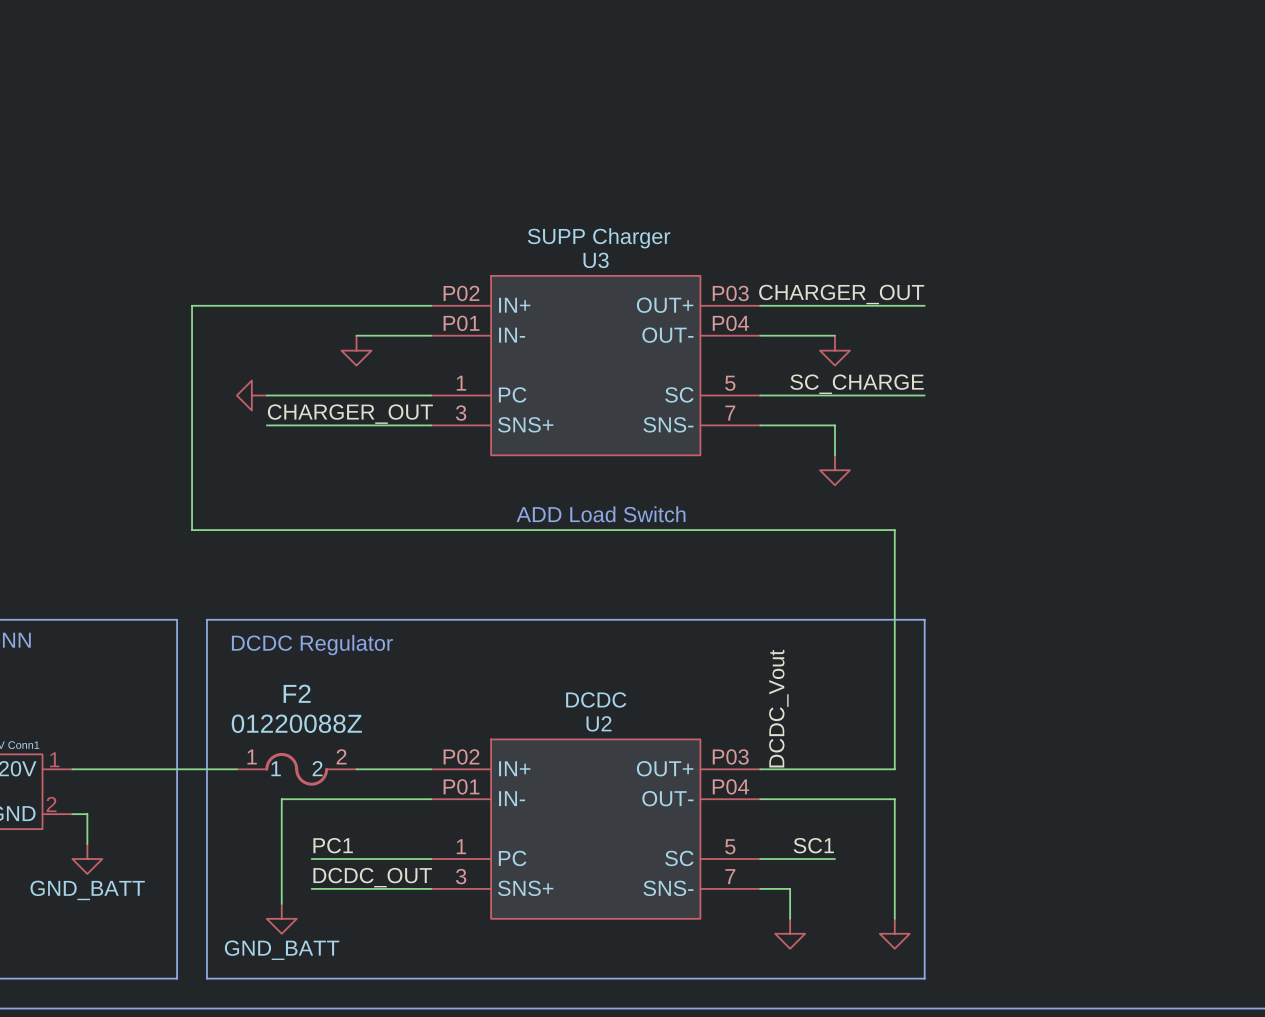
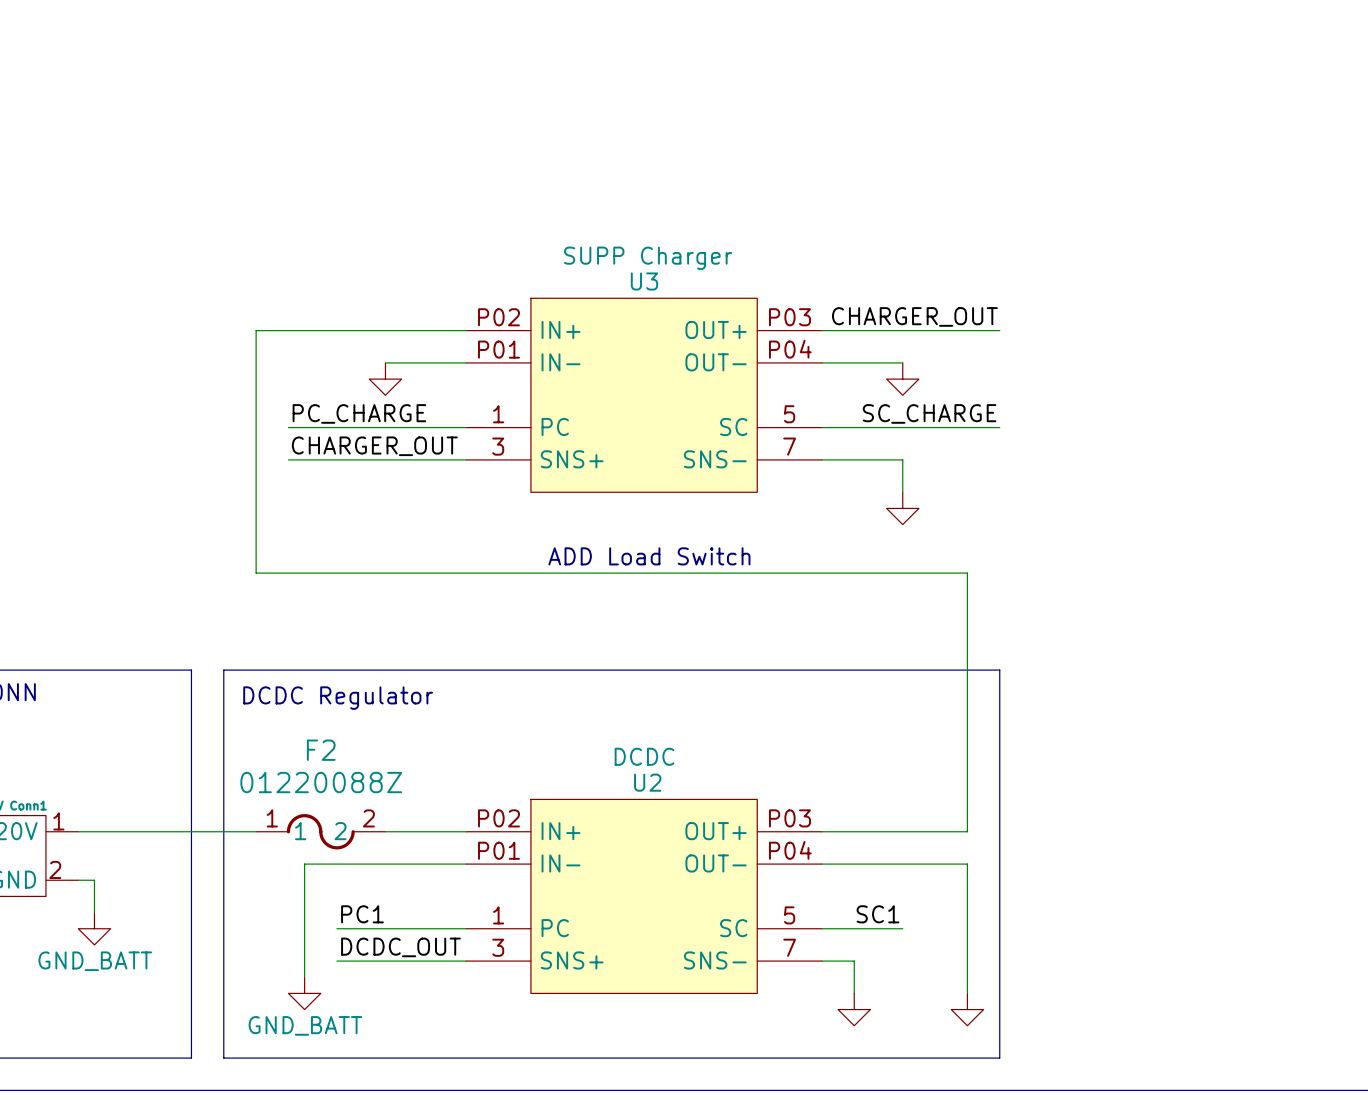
wire: (236, 305) (192, 305) (192, 530) (236, 530) -> (256, 330) (256, 573)
label: none -> PC_CHARGE (359, 413)
power symbol: (251, 395) -> none
label: DCDC_Vout (778, 708) -> none

